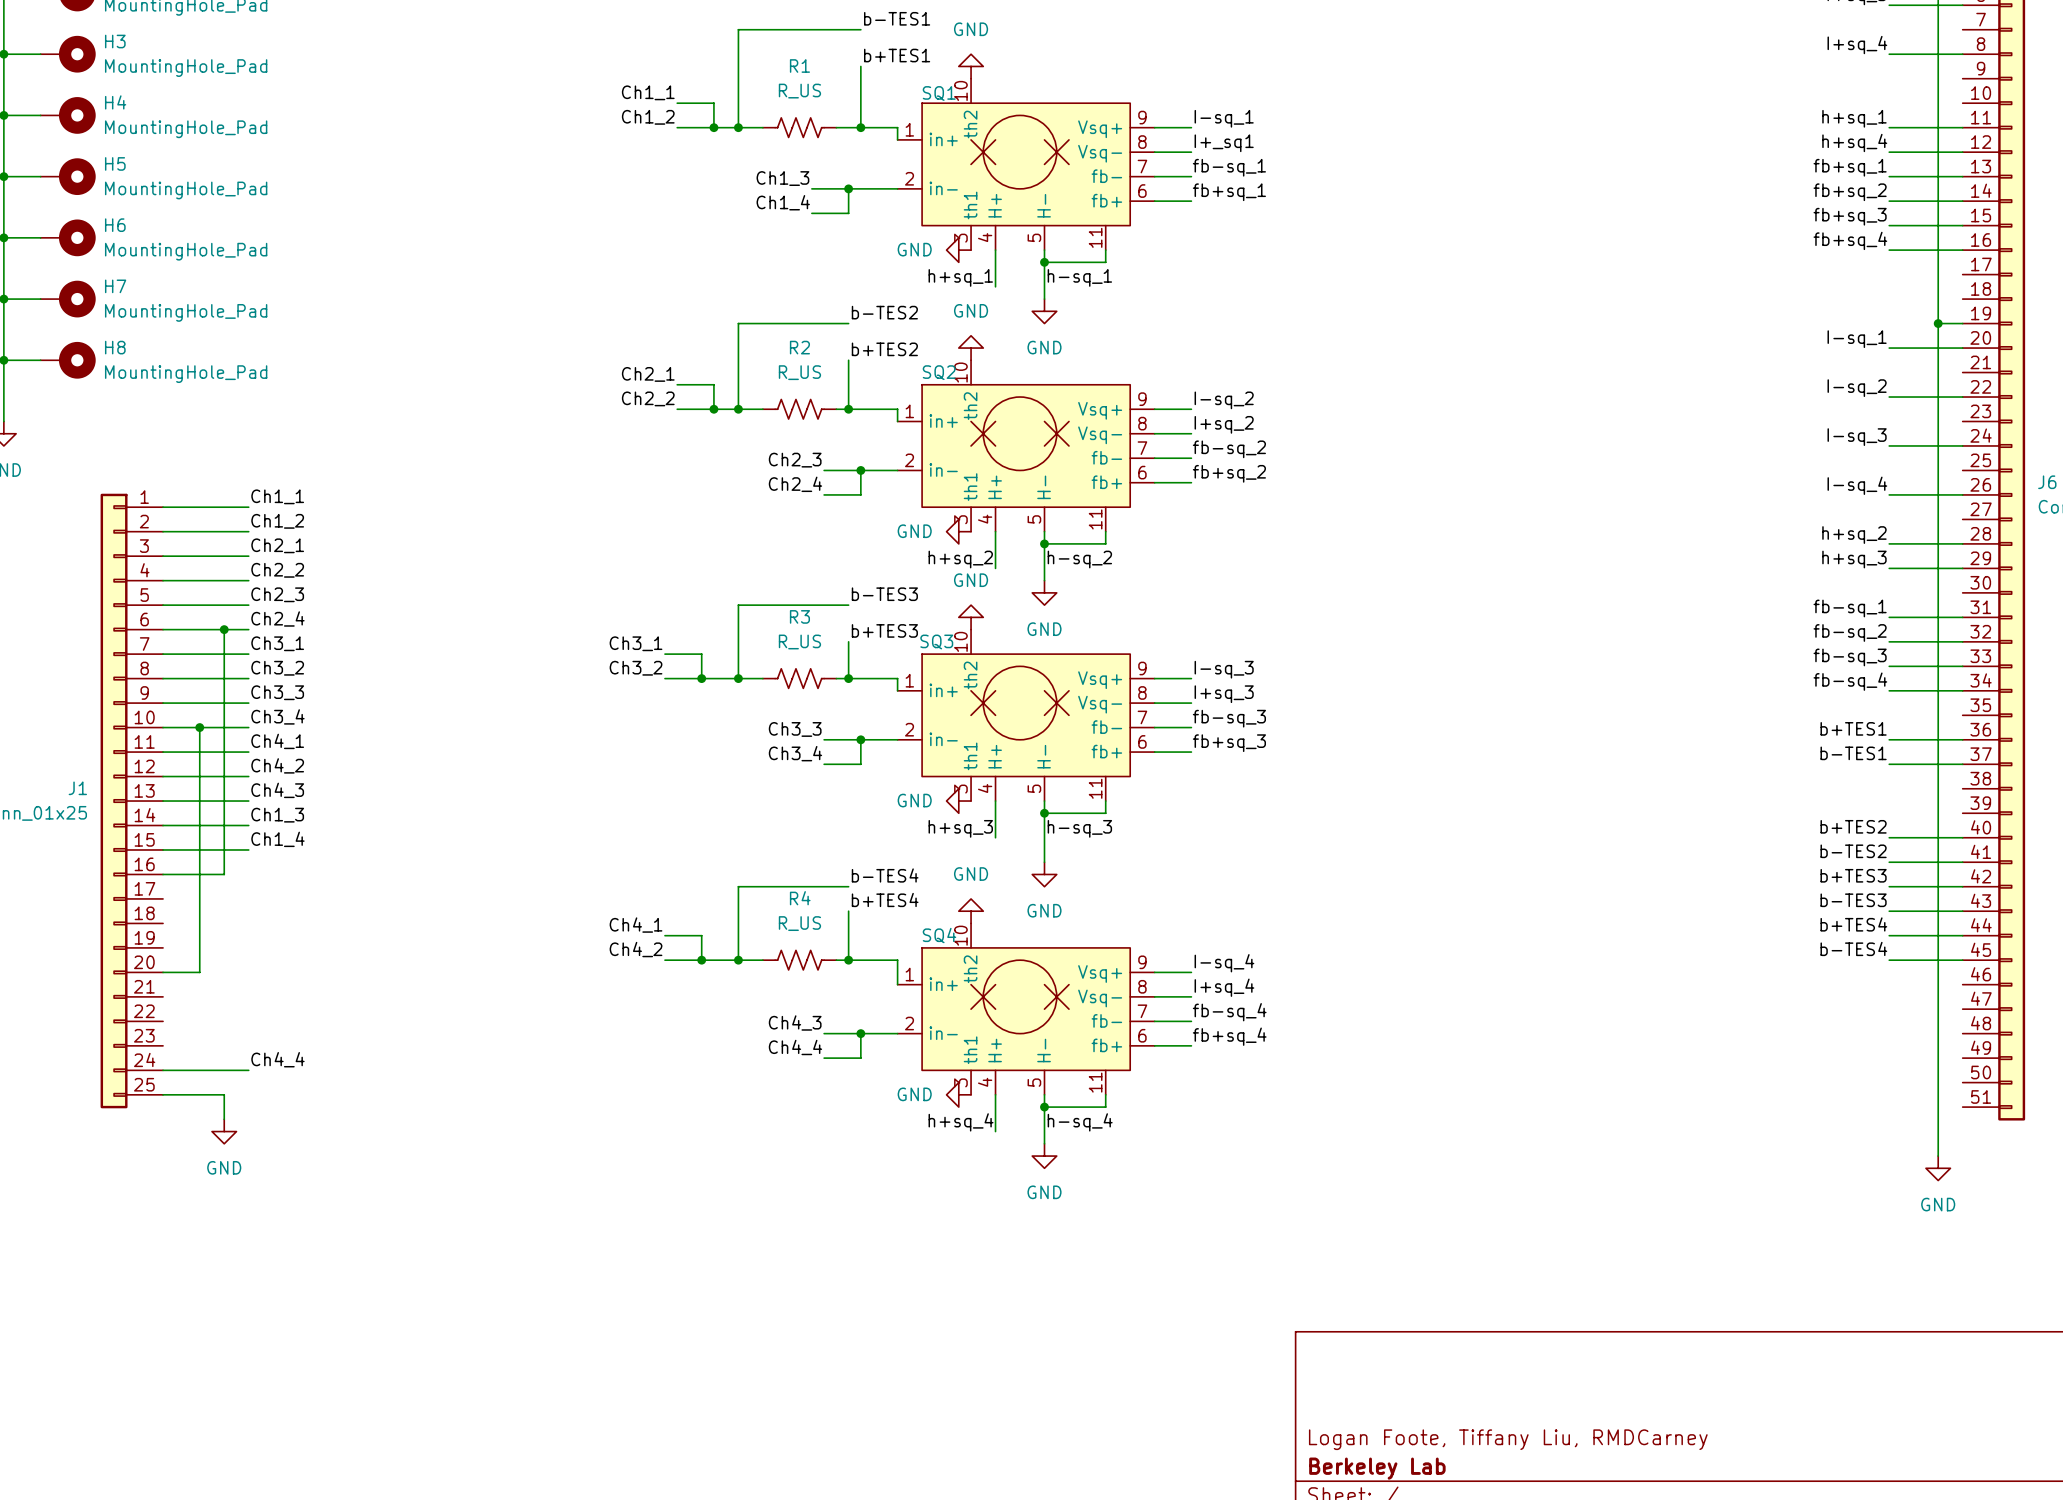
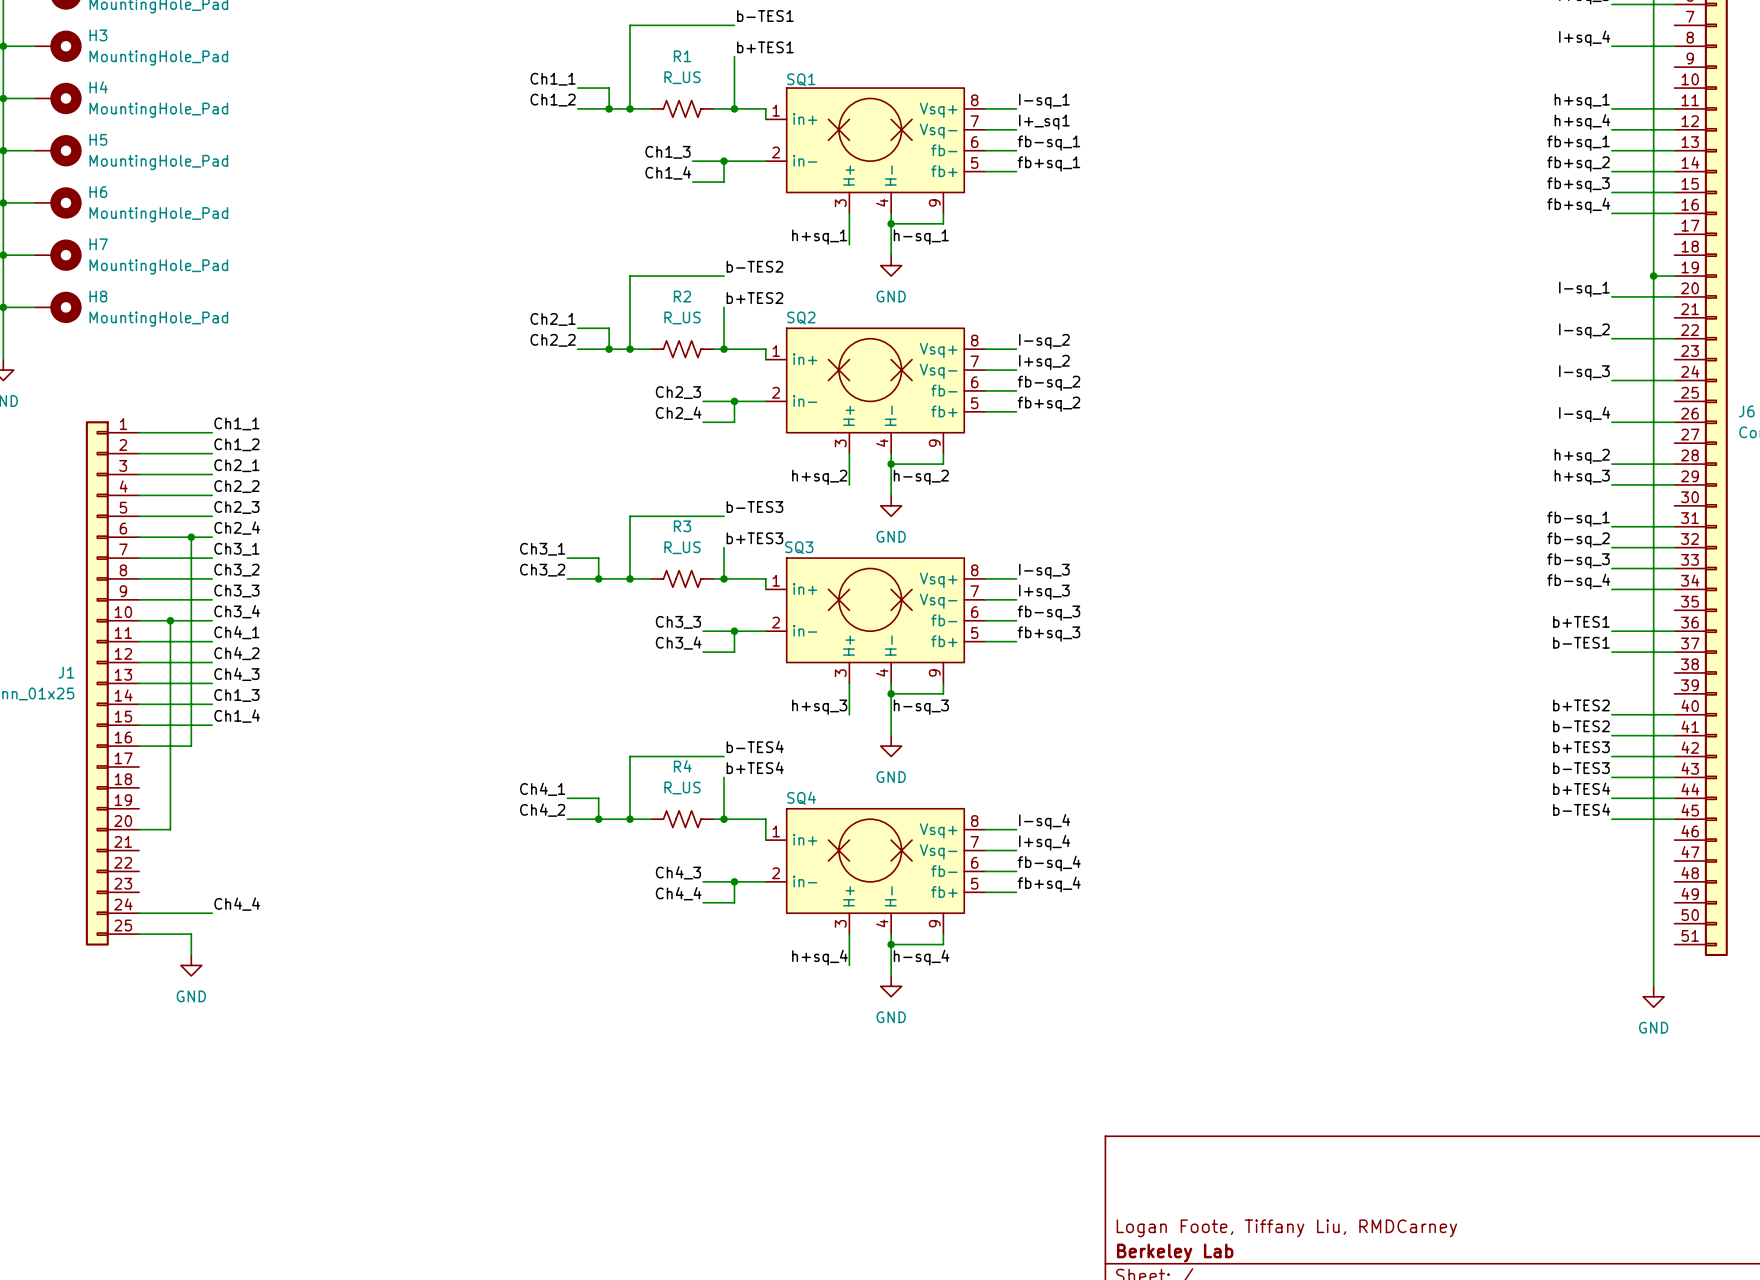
power symbol: GND (971, 66) -> none
SQ1 symbol: [897, 78, 1155, 251] -> [765, 88, 986, 214]
power symbol: GND (958, 250) -> none
power symbol: GND (971, 348) -> none
SQ2 symbol: [897, 360, 1155, 532] -> [765, 328, 986, 454]
power symbol: GND (958, 531) -> none
power symbol: GND (971, 617) -> none
SQ3 symbol: [897, 629, 1155, 802] -> [765, 558, 986, 684]
power symbol: GND (958, 801) -> none
power symbol: GND (971, 911) -> none
SQ4 symbol: [897, 923, 1155, 1095] -> [765, 808, 986, 935]
power symbol: GND (958, 1094) -> none

